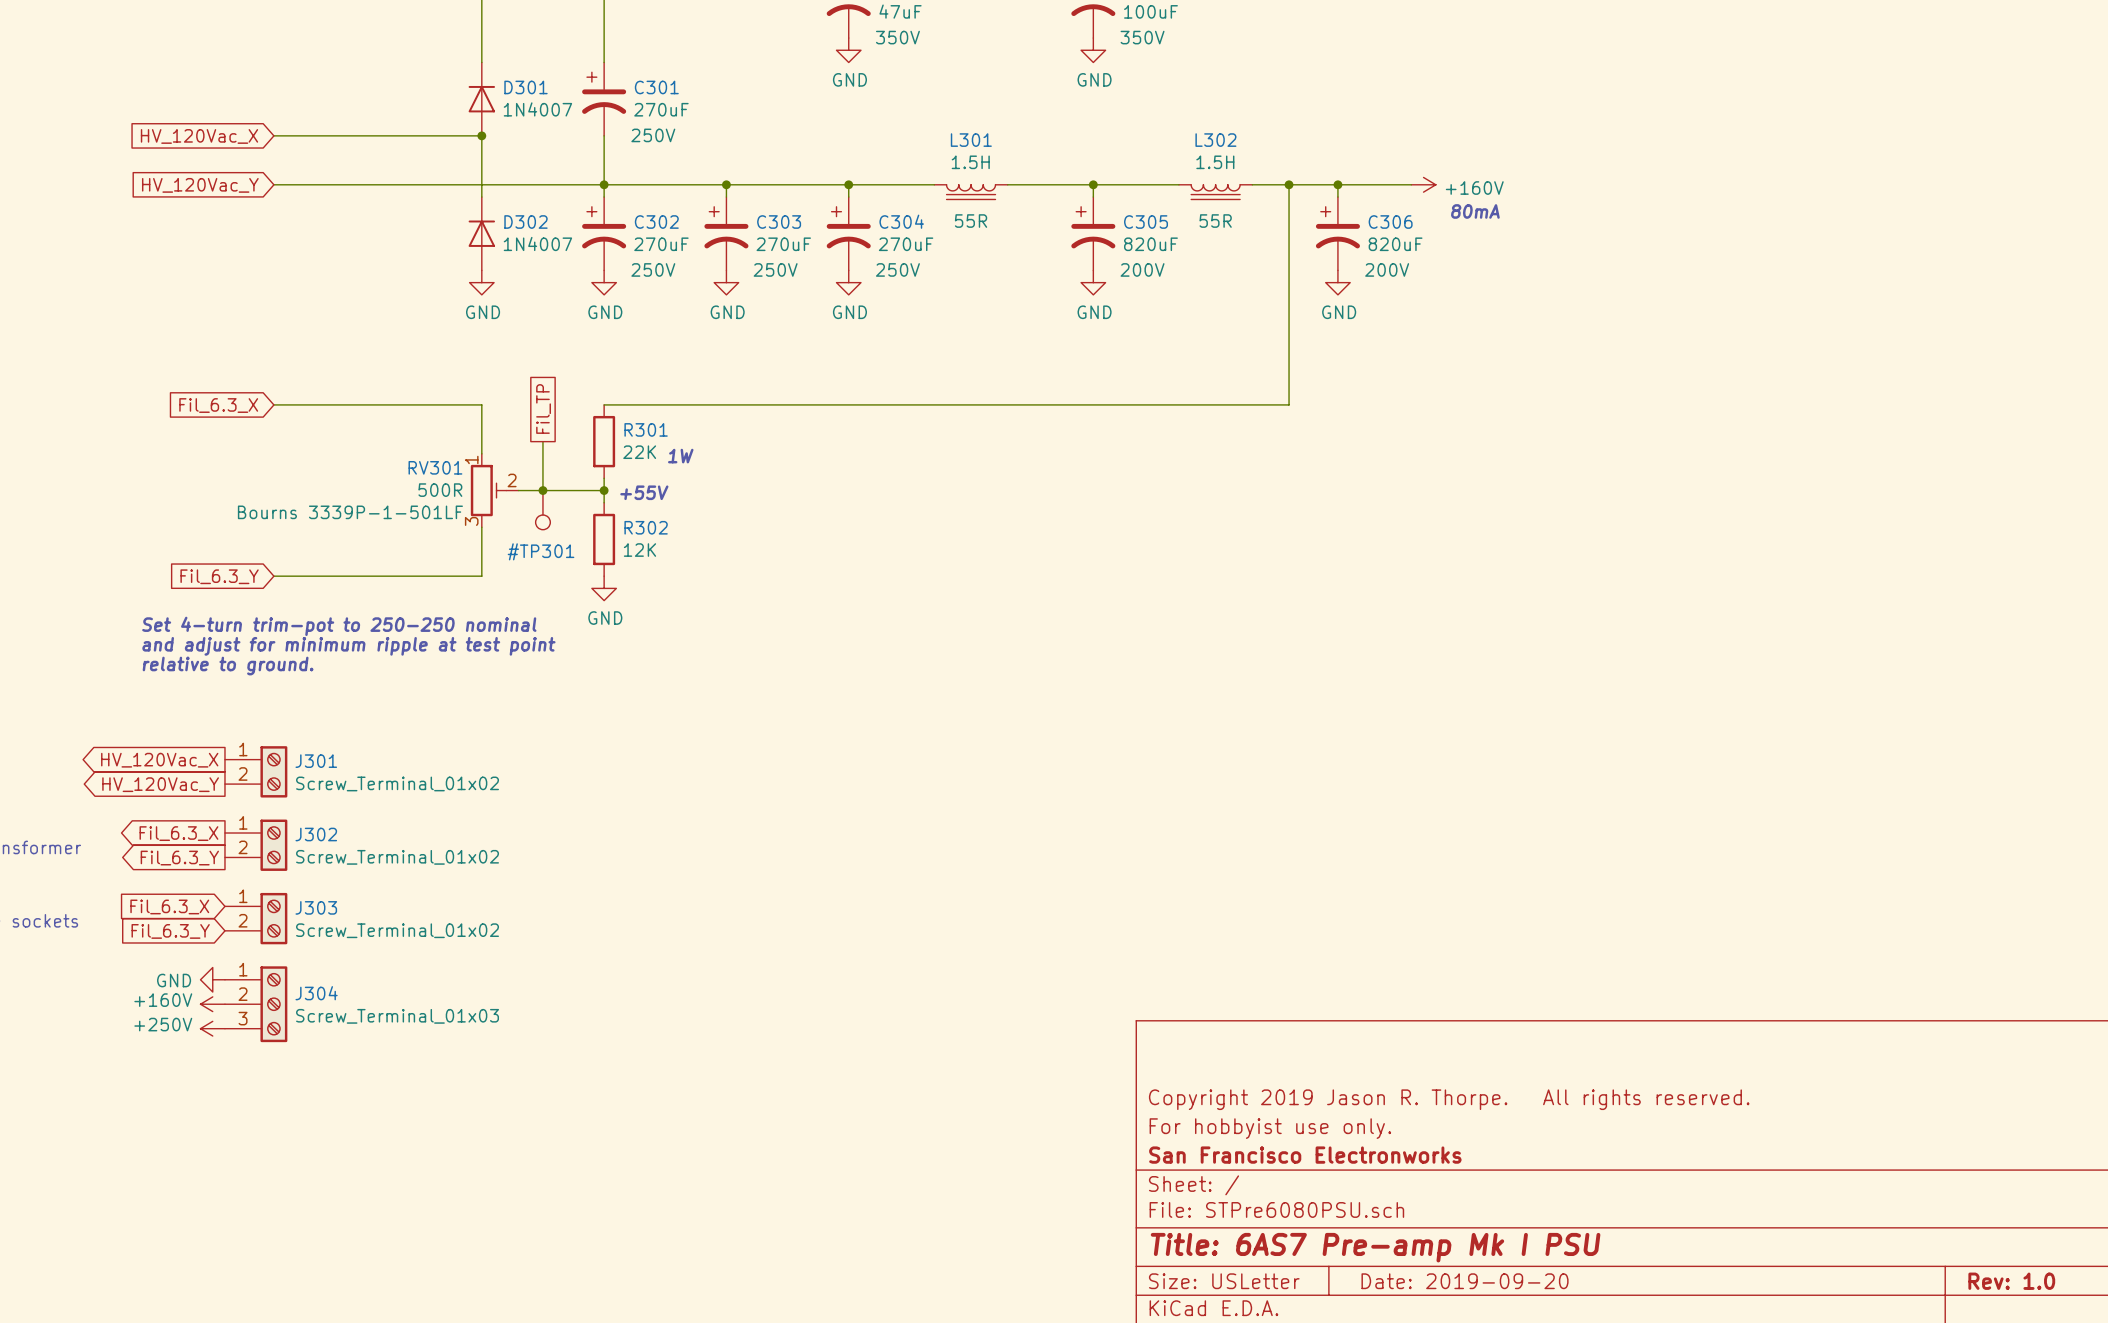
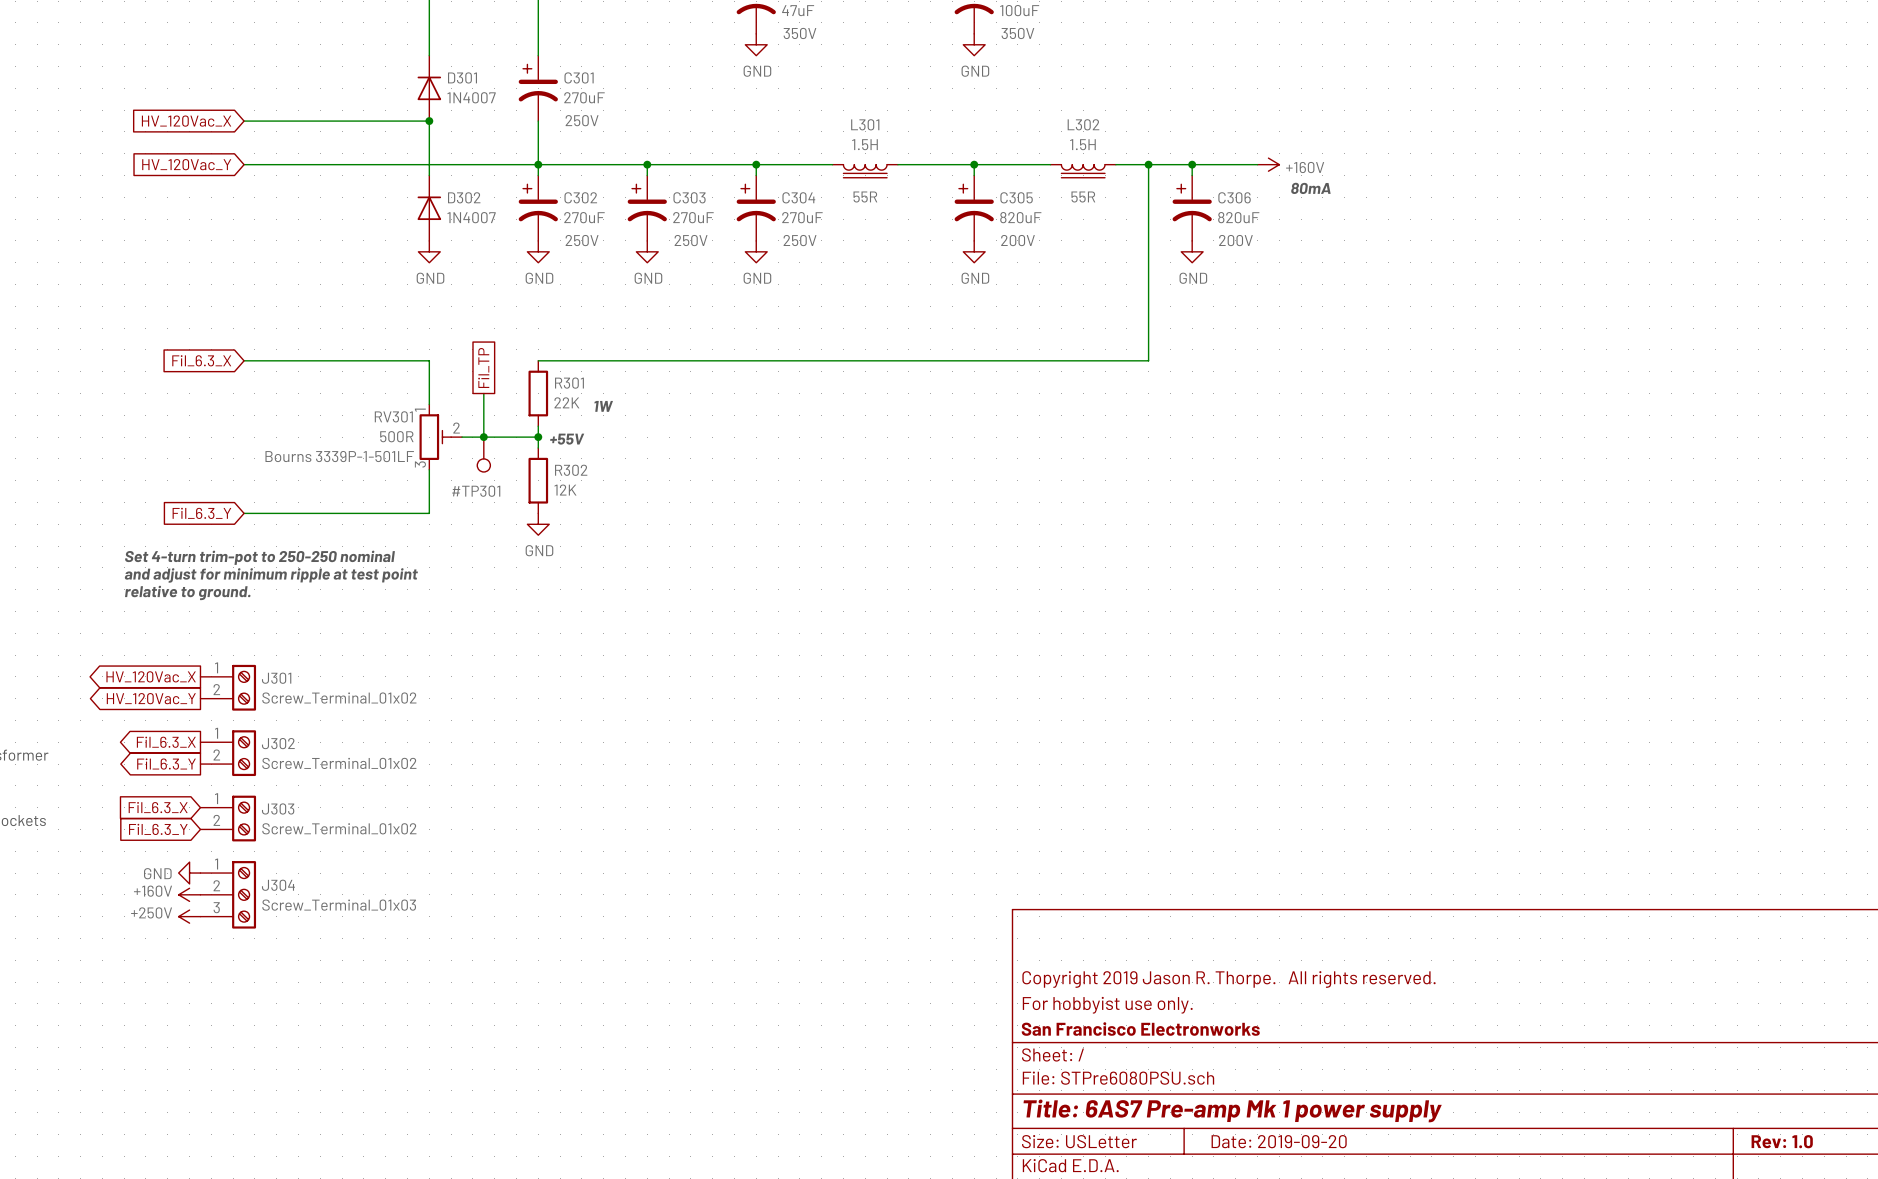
title block: Title: 6AS7 Pre-amp Mk I PSU (1375, 1247) -> Title: 6AS7 Pre-amp Mk 1 power supply (1232, 1110)

